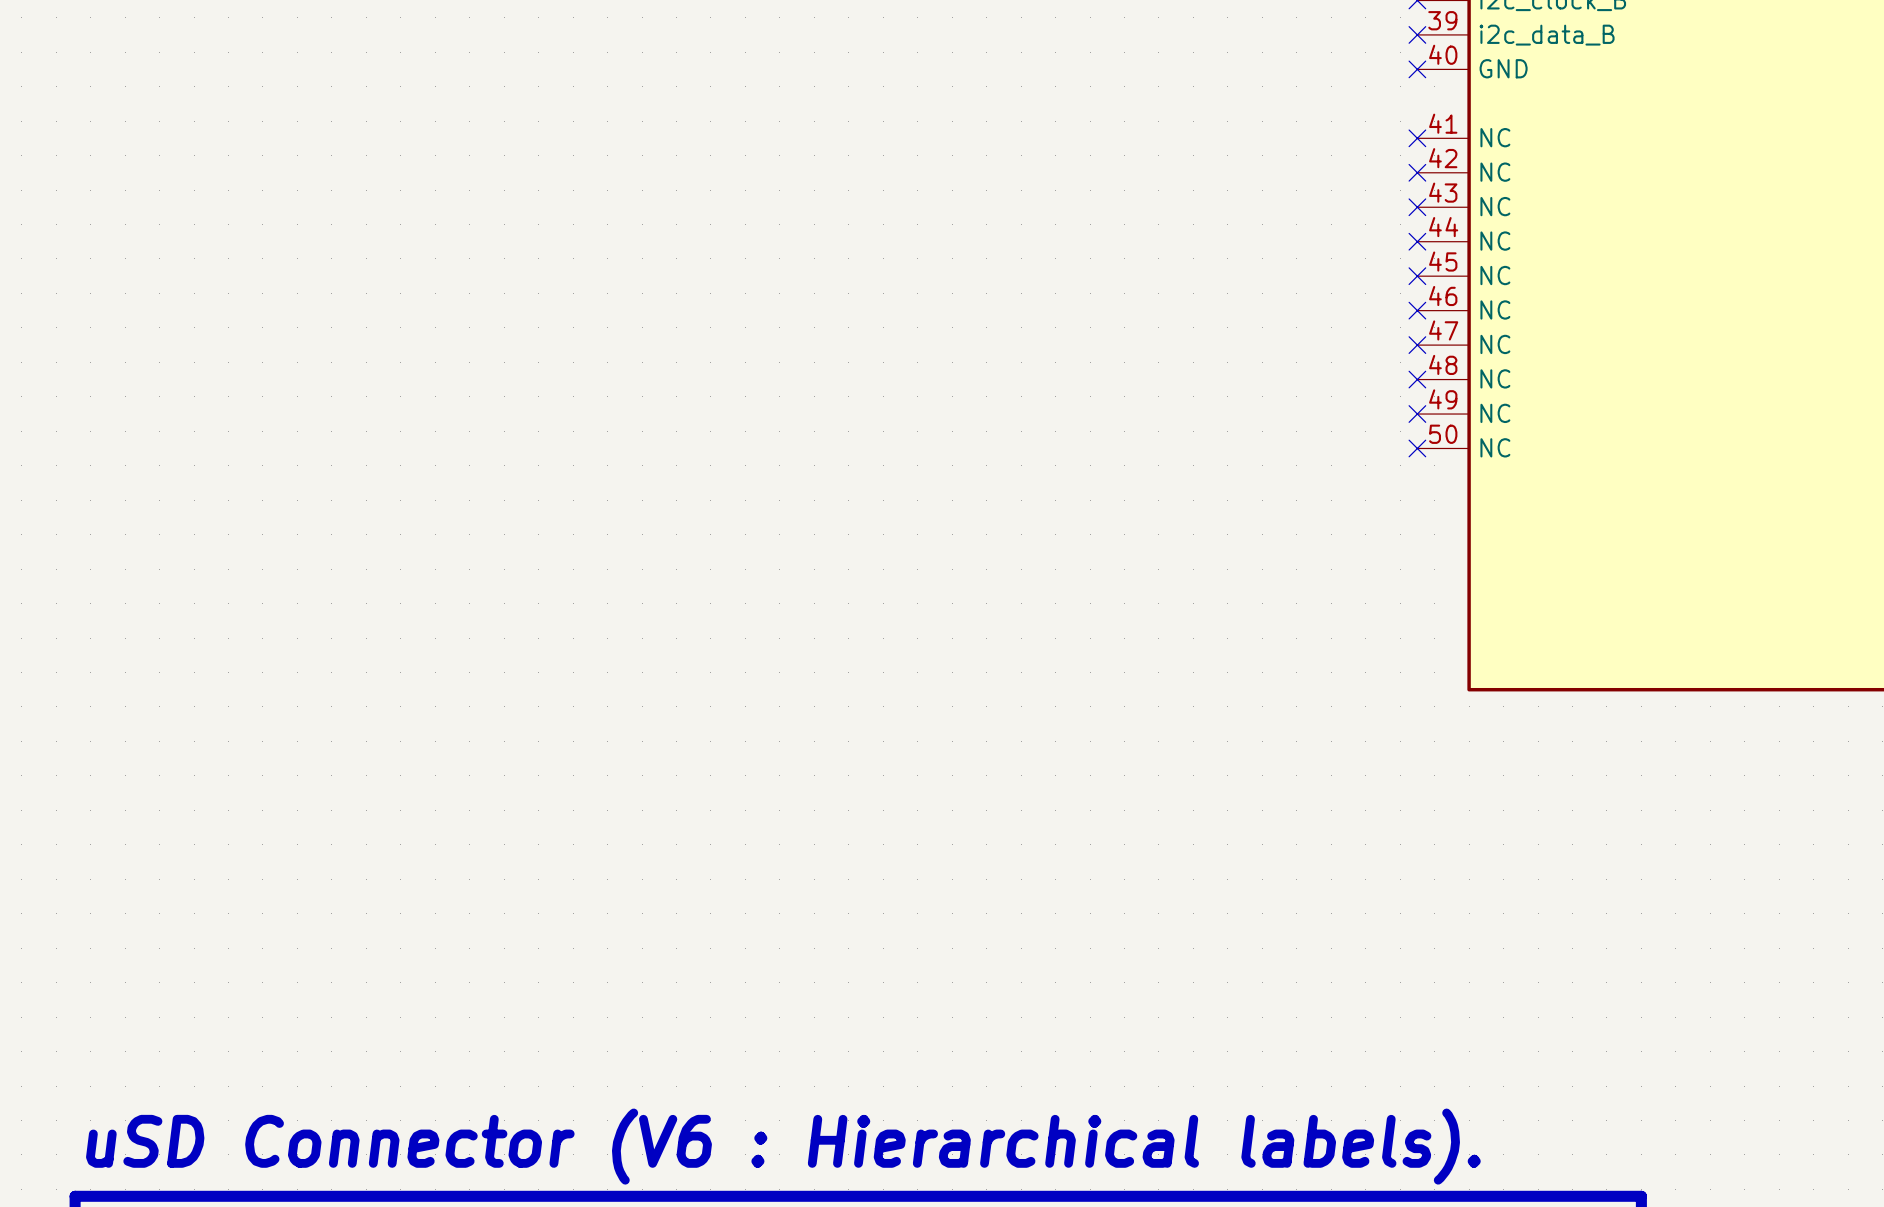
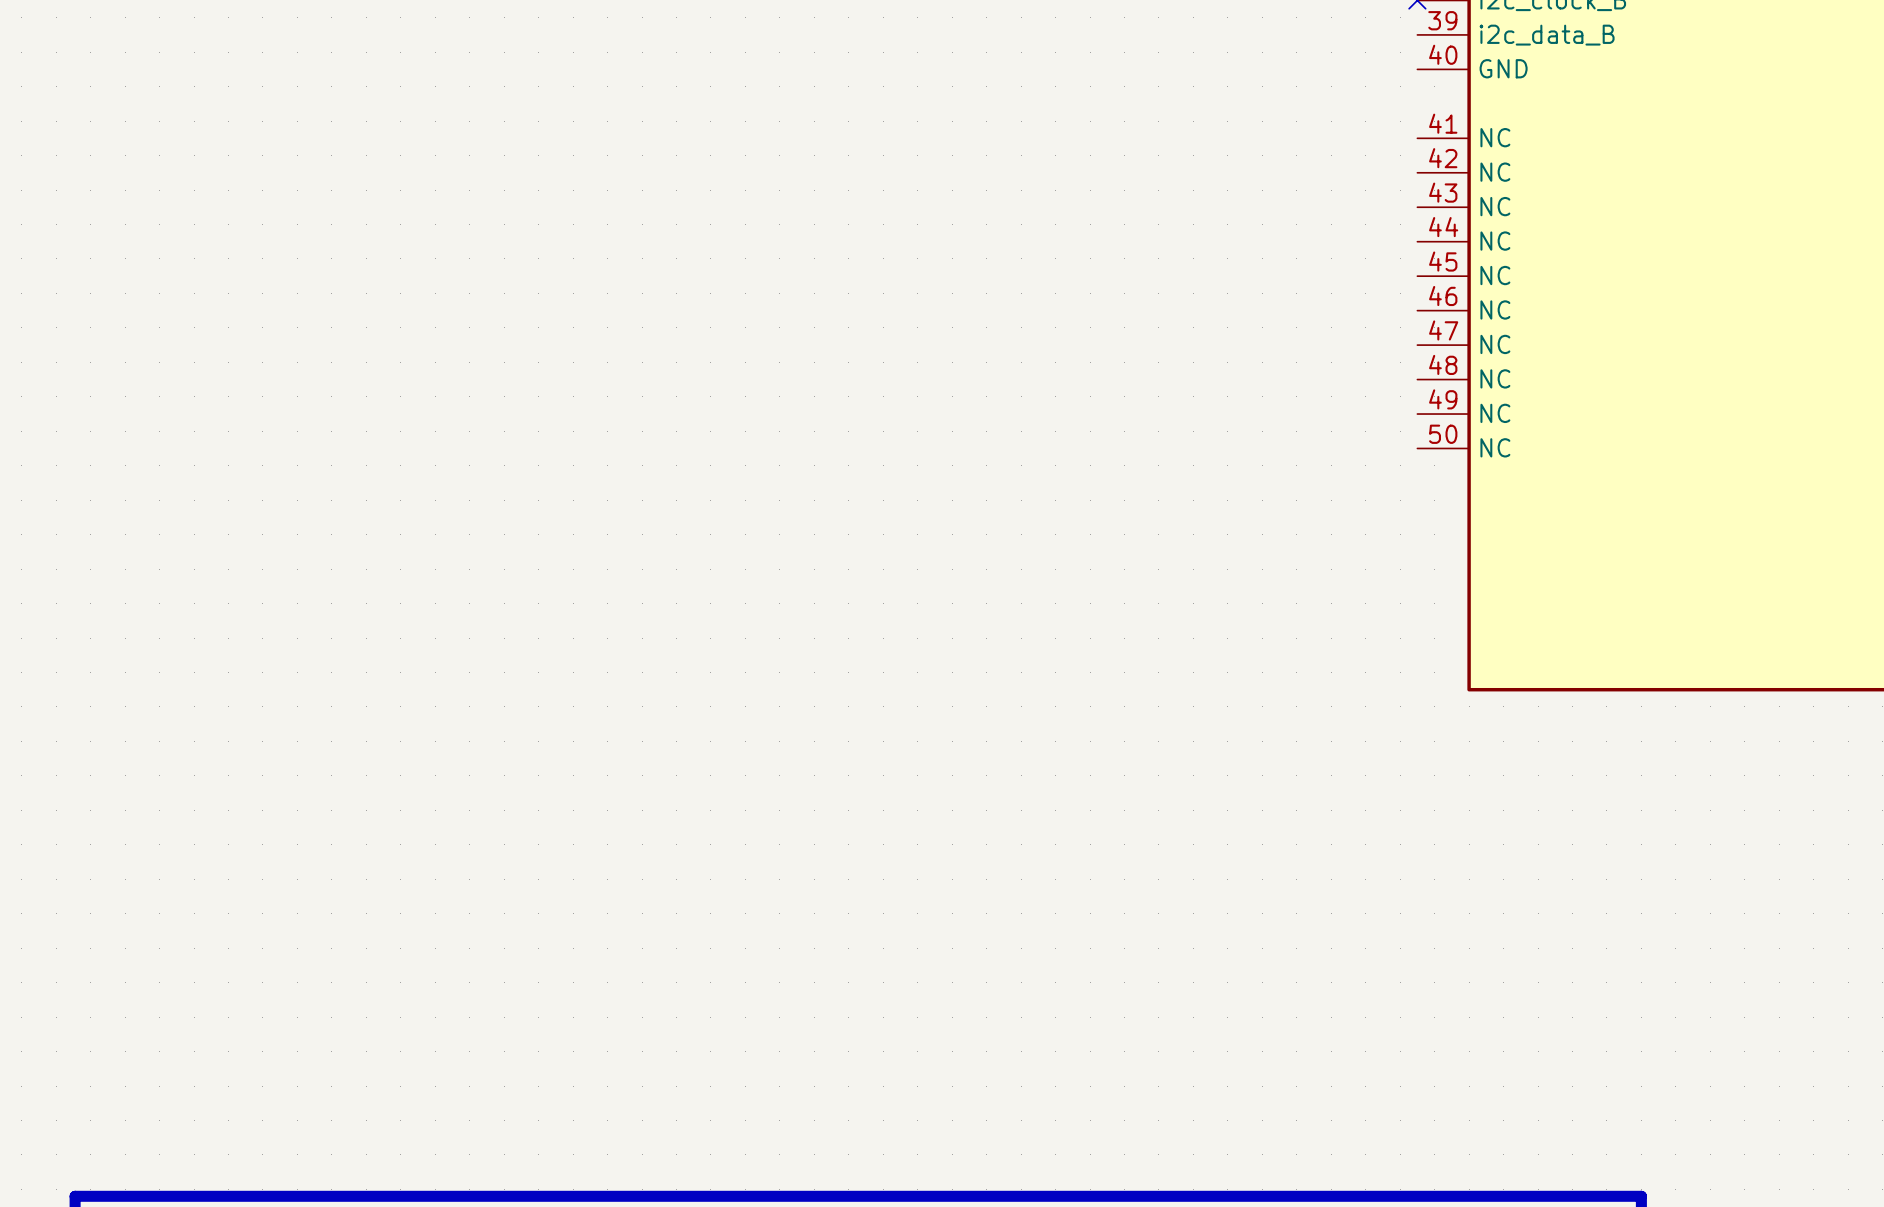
no-connect mark: (1417, 34) -> none
no-connect mark: (1417, 69) -> none
no-connect mark: (1417, 138) -> none
no-connect mark: (1417, 172) -> none
no-connect mark: (1417, 207) -> none
no-connect mark: (1417, 241) -> none
no-connect mark: (1417, 276) -> none
no-connect mark: (1417, 310) -> none
no-connect mark: (1417, 345) -> none
no-connect mark: (1417, 379) -> none
no-connect mark: (1417, 414) -> none
no-connect mark: (1417, 448) -> none
text: uSD Connector (V6 : Hierarchical labels). (783, 1146) -> none

